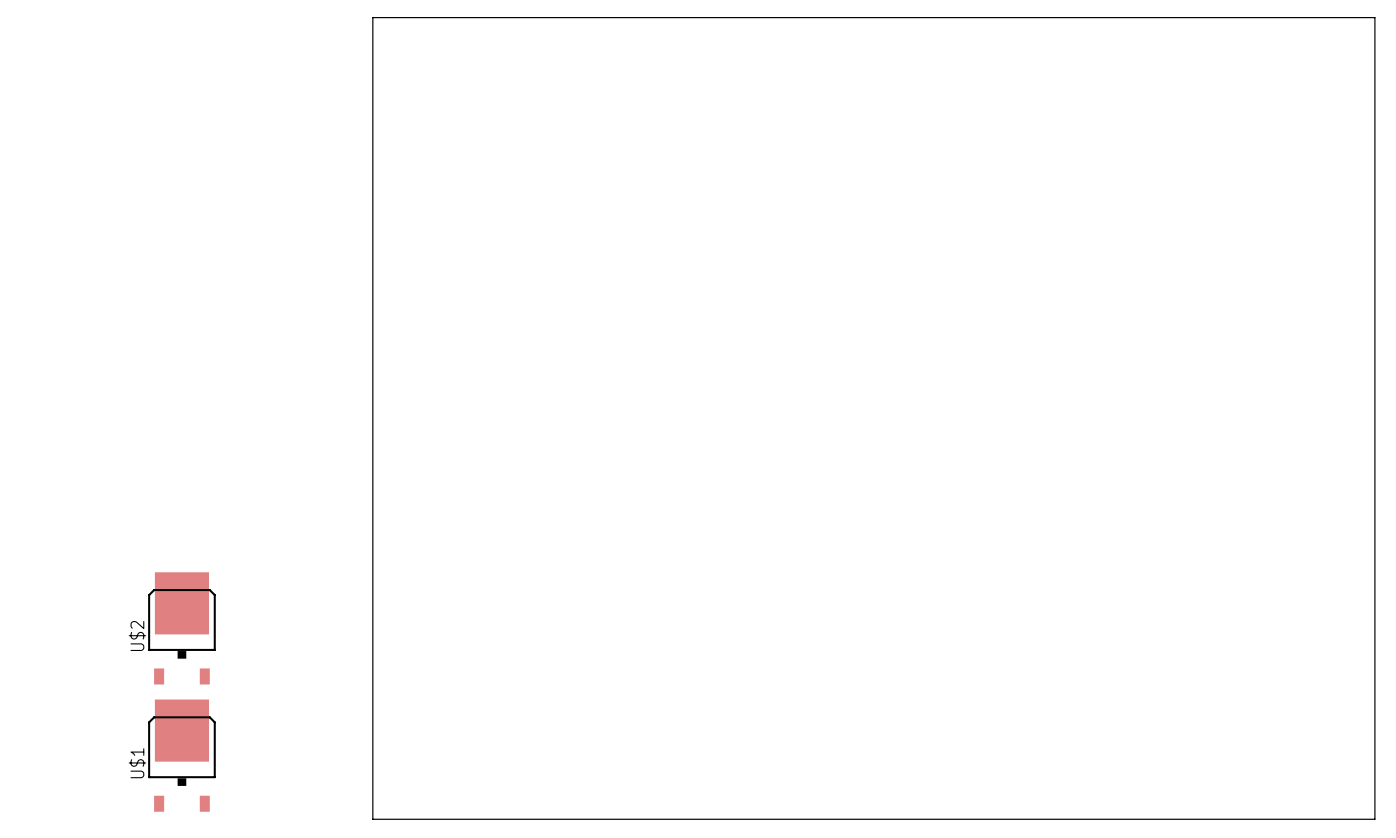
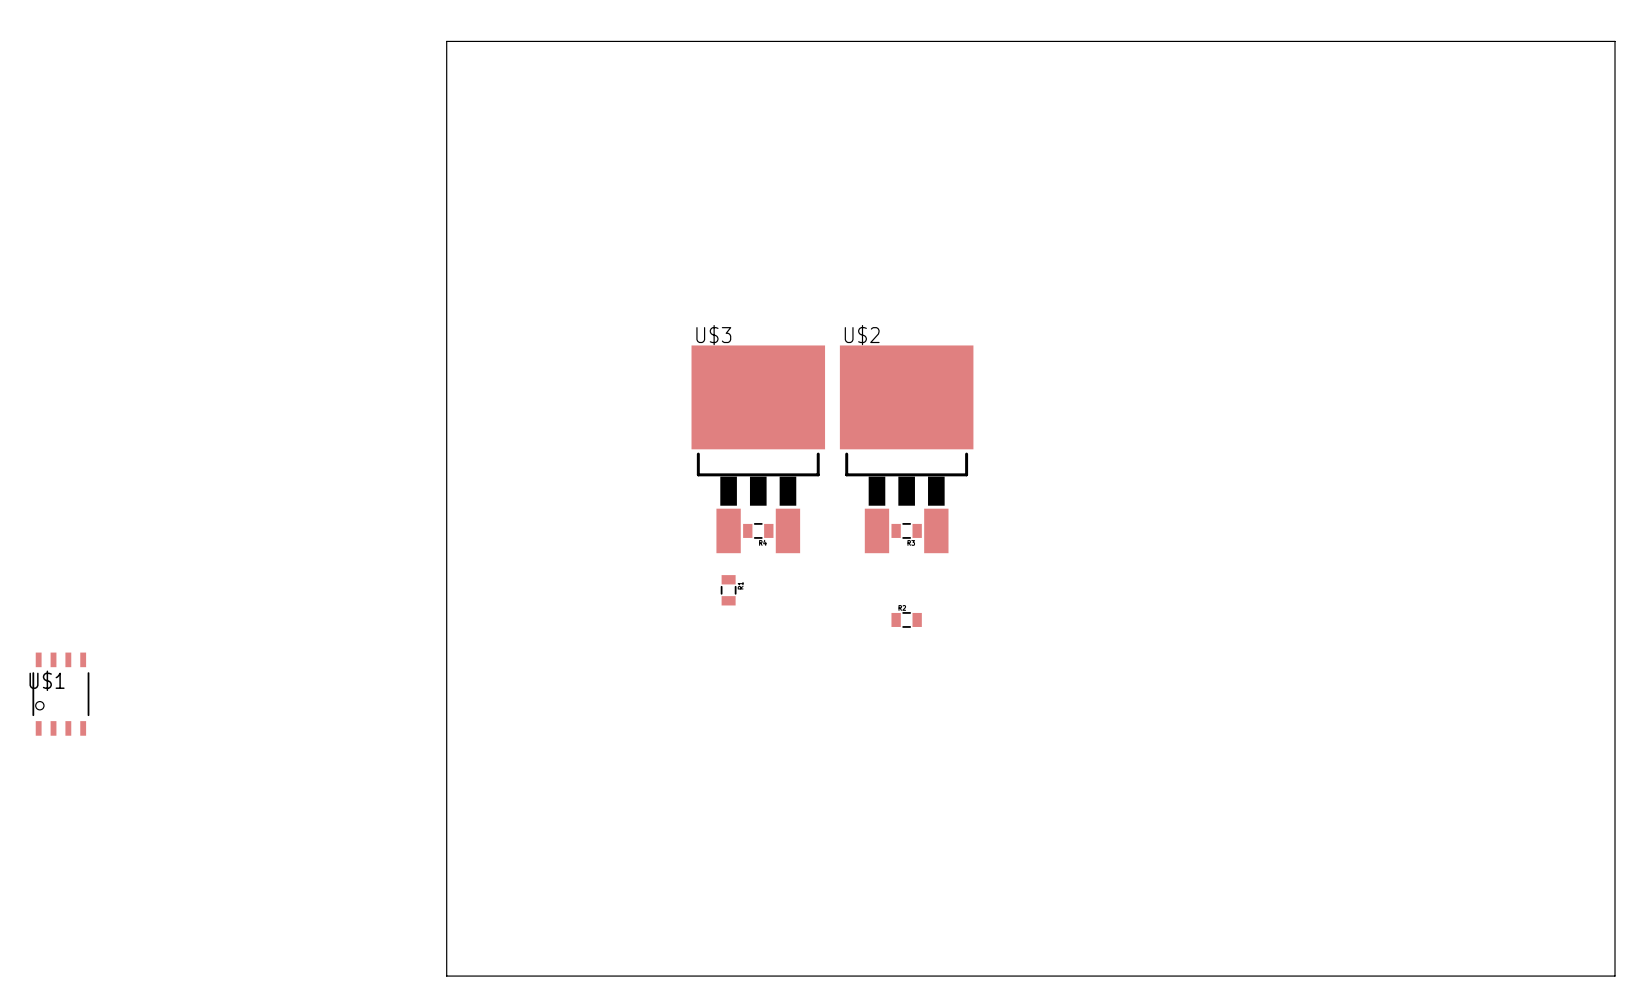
U$3: none -> (758, 449)
part: none -> (758, 530)
part: none -> (906, 530)
part: none -> (728, 590)
part: none -> (906, 619)
U$2 footprint: [148, 572, 216, 685] -> [839, 345, 974, 554]
U$2 name position: U$2 (137, 635) -> U$2 (862, 335)
U$1 footprint: [148, 699, 216, 812] -> [32, 652, 90, 736]
U$1 name position: U$1 (137, 763) -> U$1 (47, 680)

